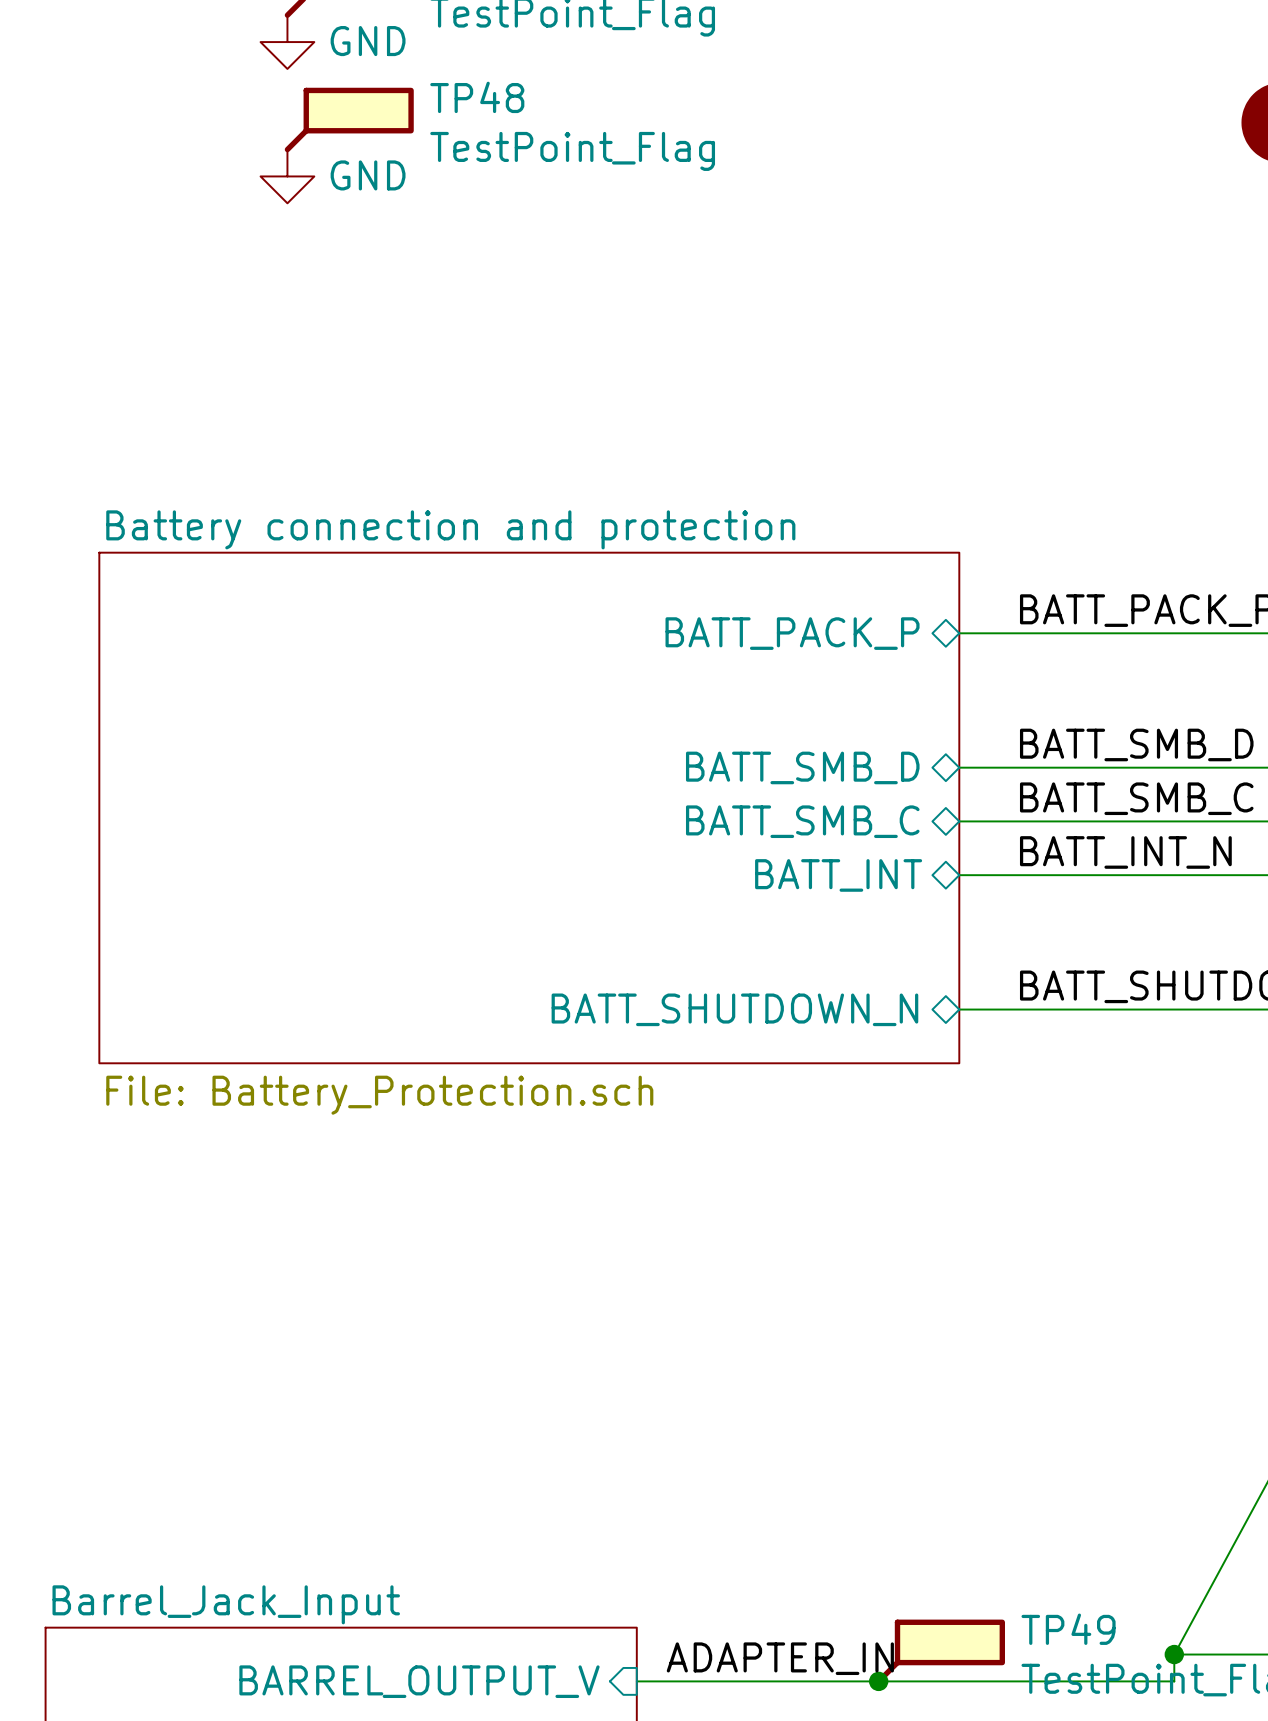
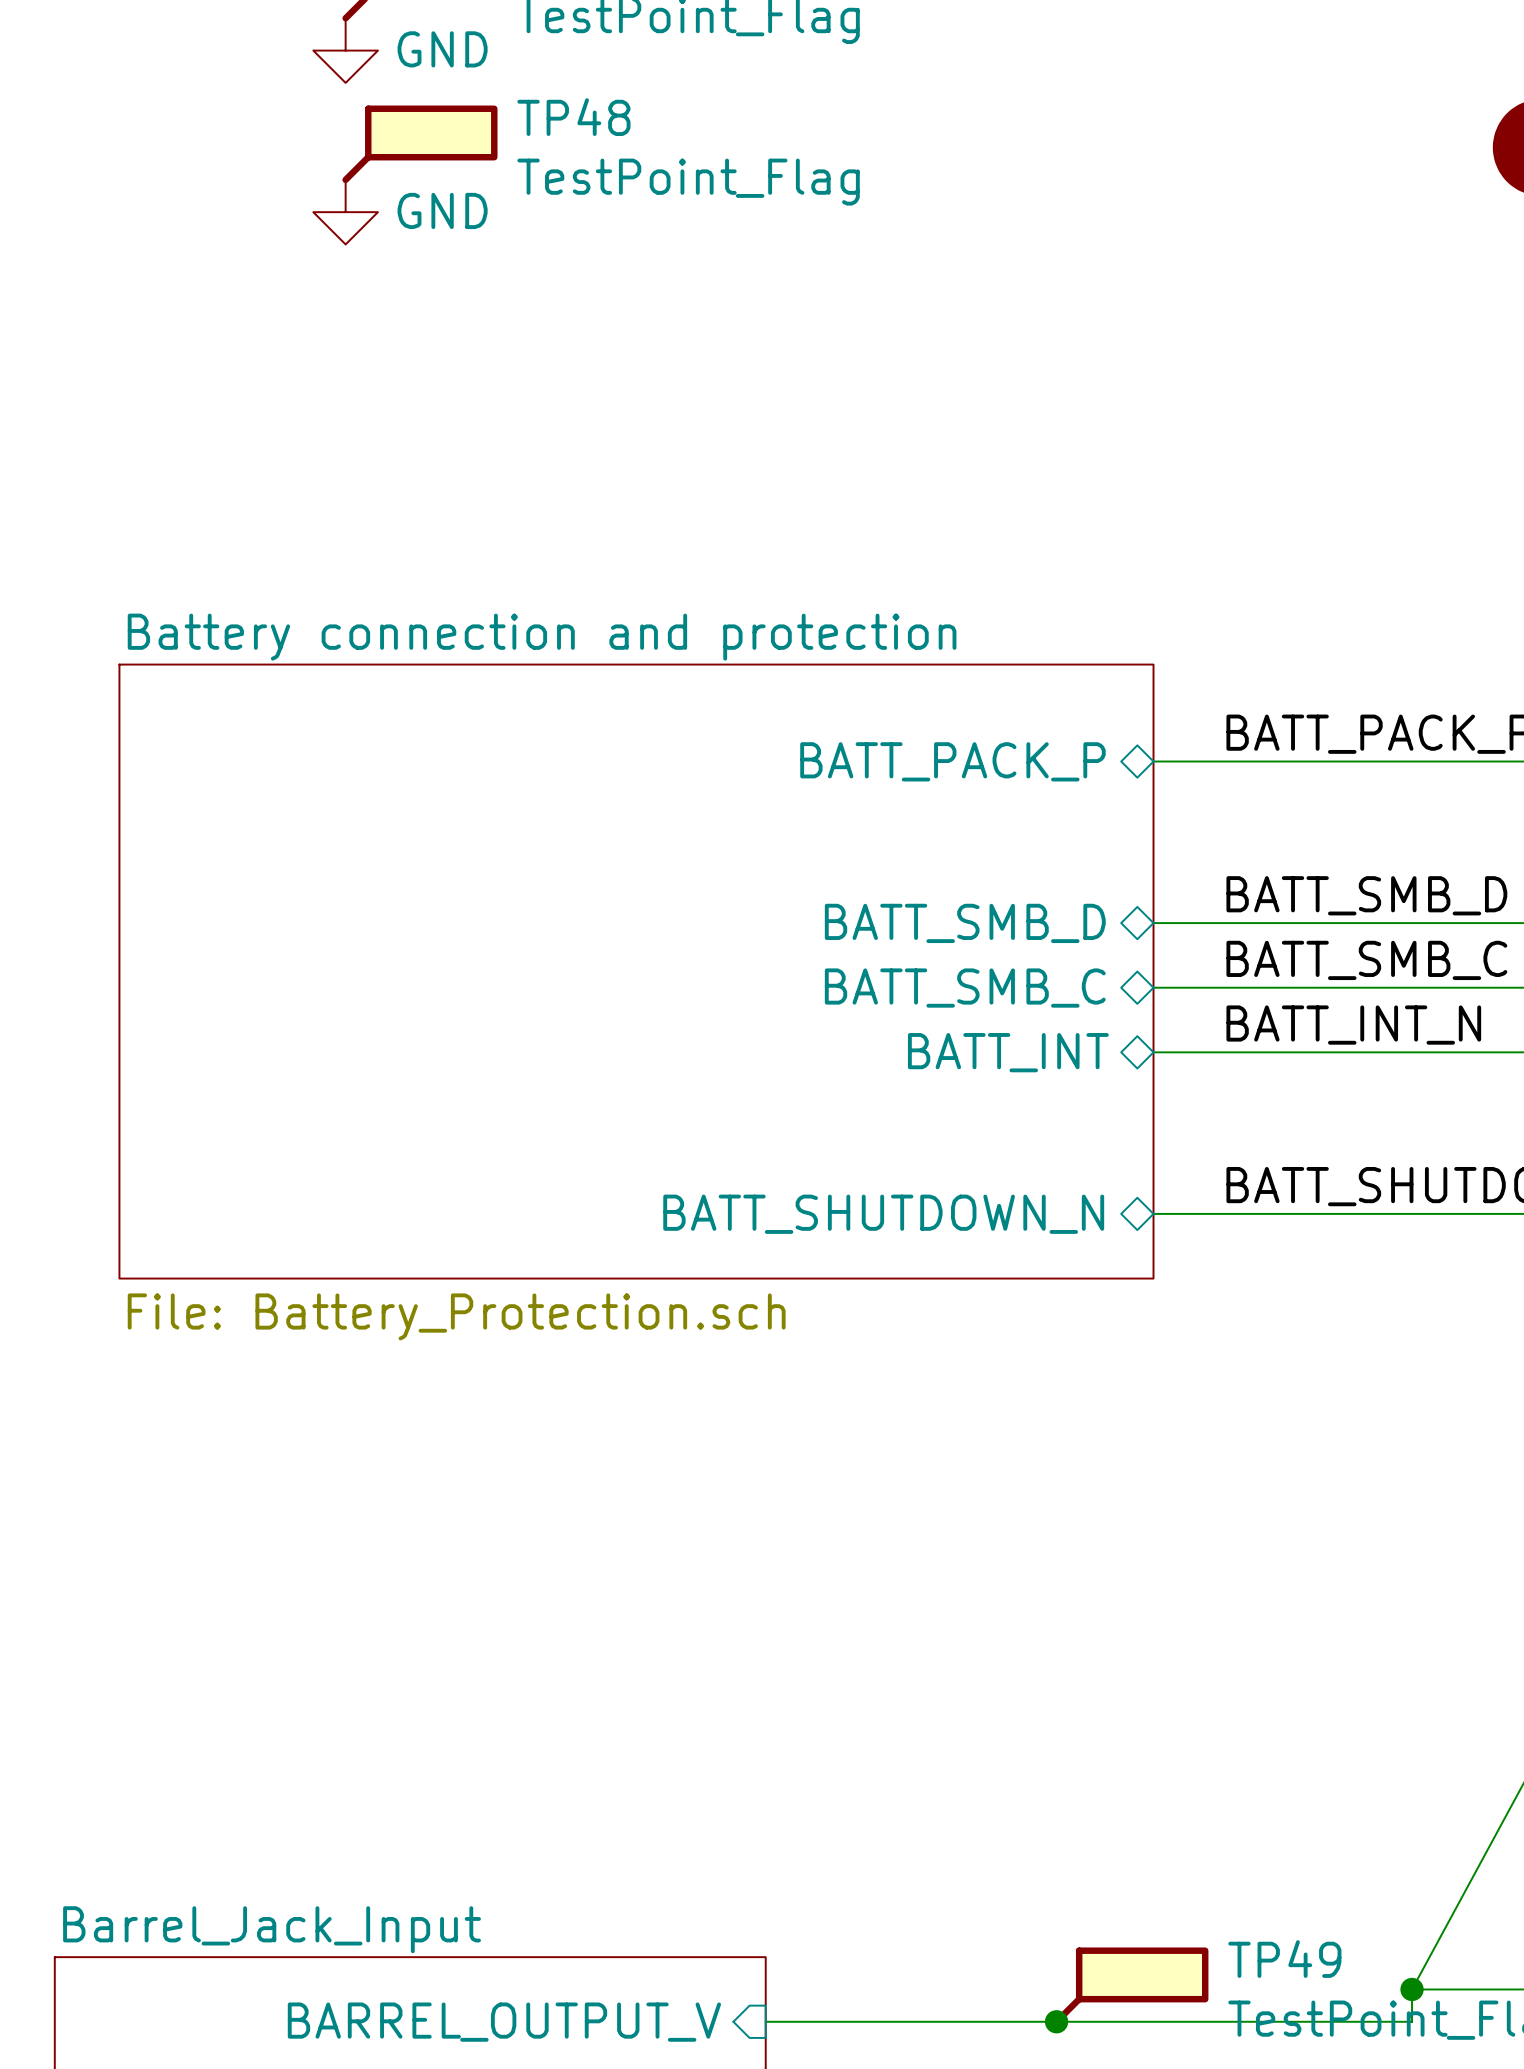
label: ADAPTER_IN (780, 1658) -> none

